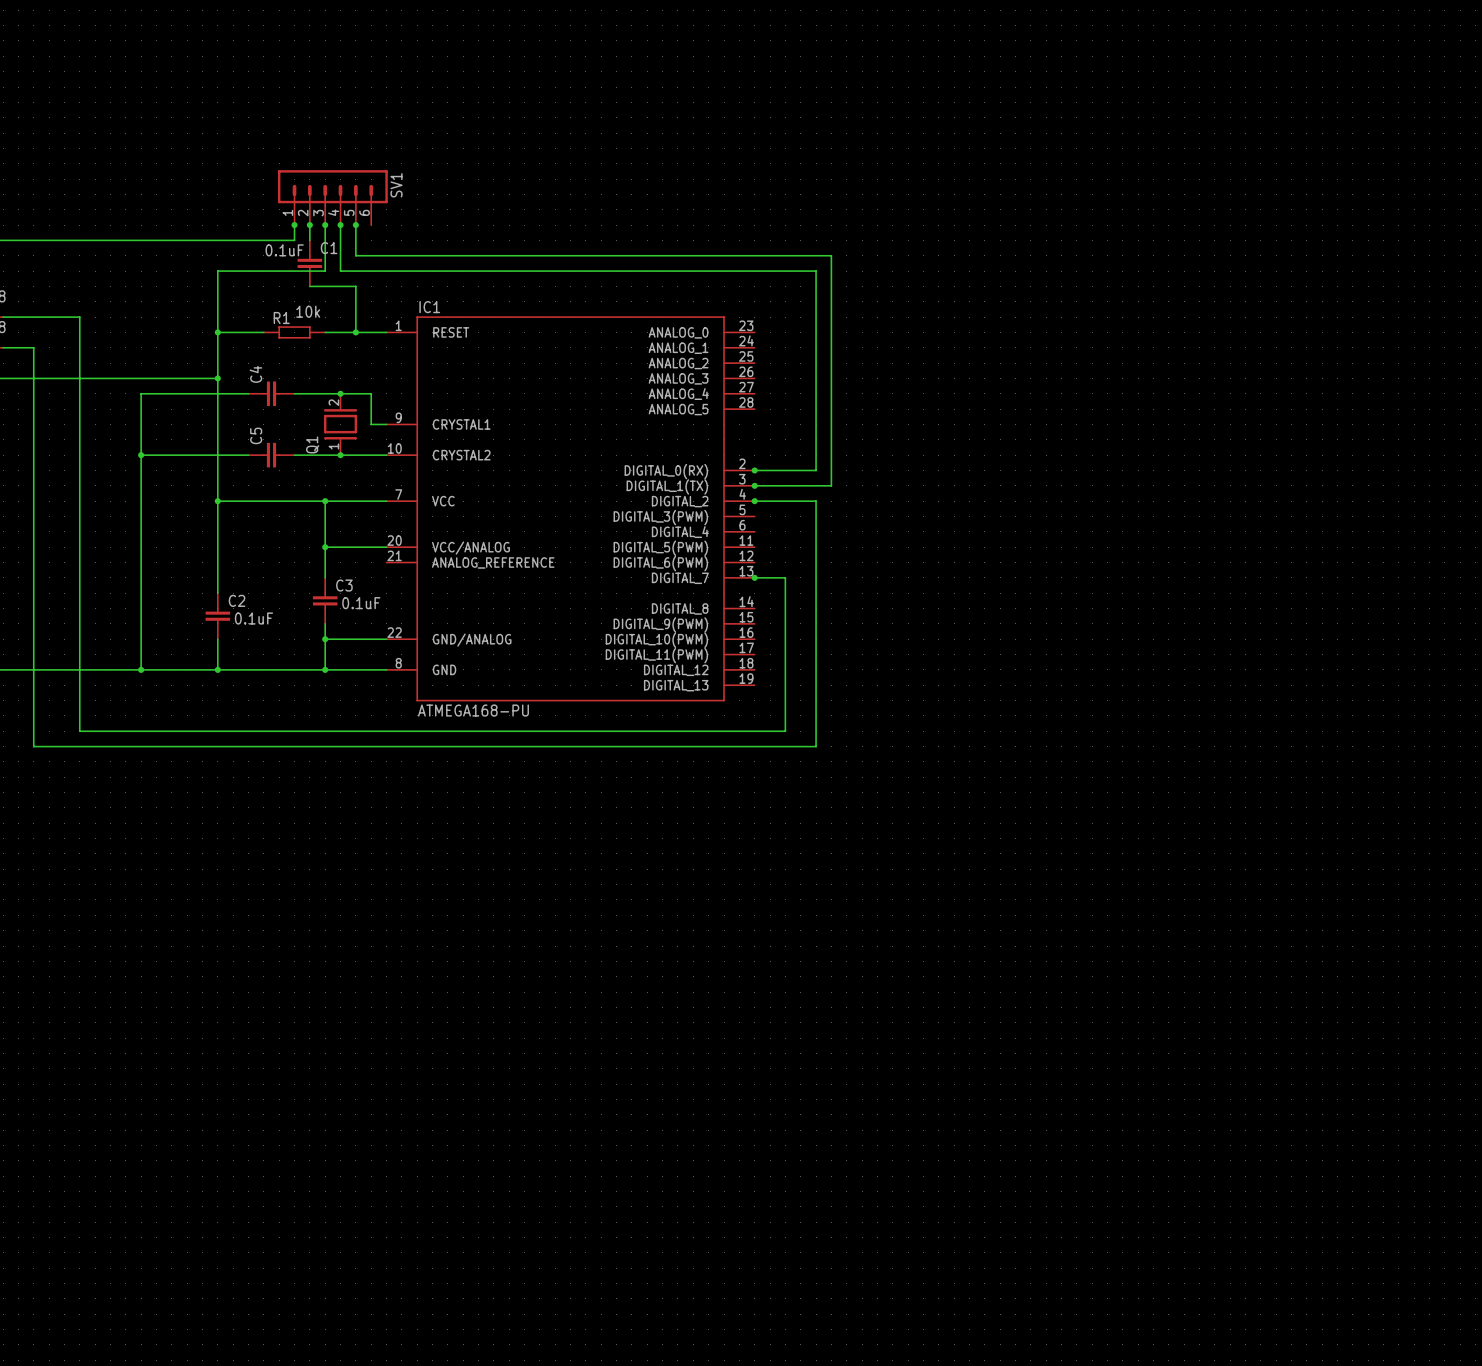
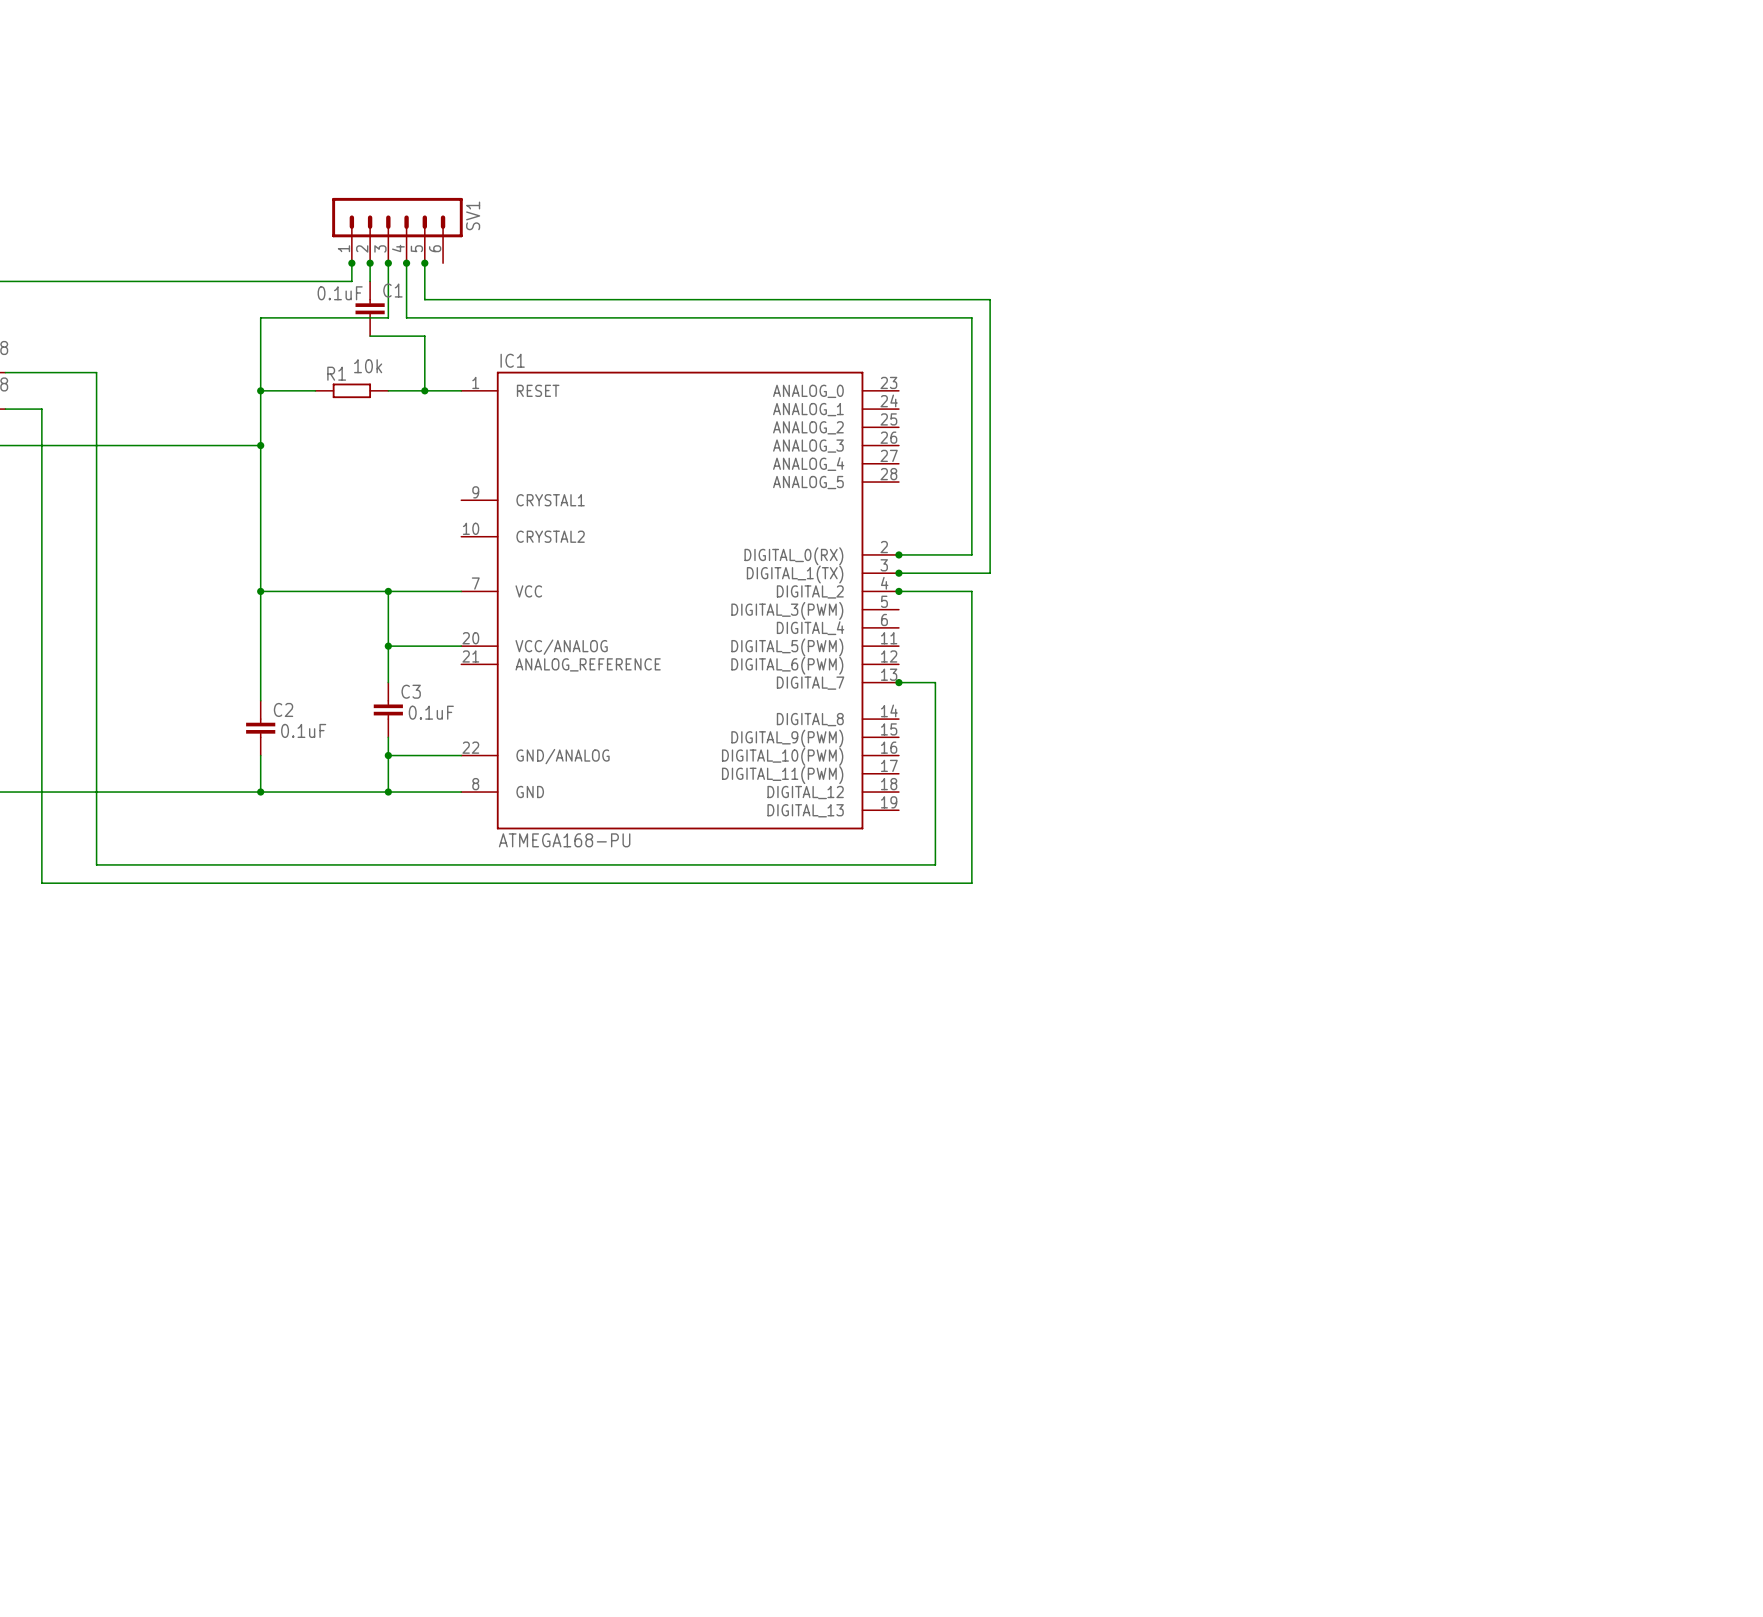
wire: (248, 393) (141, 393) (141, 669) -> none
C4: (271, 393) -> none
wire: (294, 393) (371, 393) (371, 424) (386, 424) -> none
junction: (340, 393) -> none
Q1: (340, 424) -> none
wire: (141, 455) (248, 455) -> none
junction: (141, 455) -> none
C5: (271, 455) -> none
wire: (294, 455) (386, 455) -> none
junction: (340, 455) -> none
junction: (141, 669) -> none

